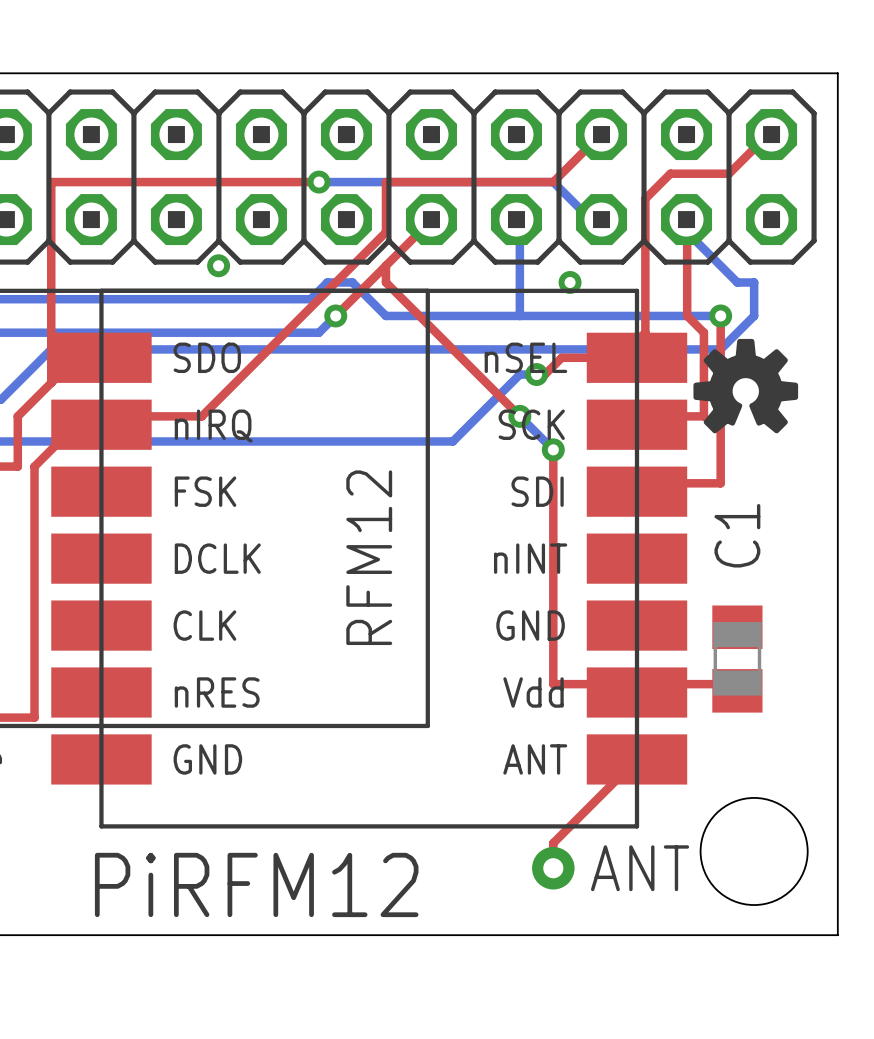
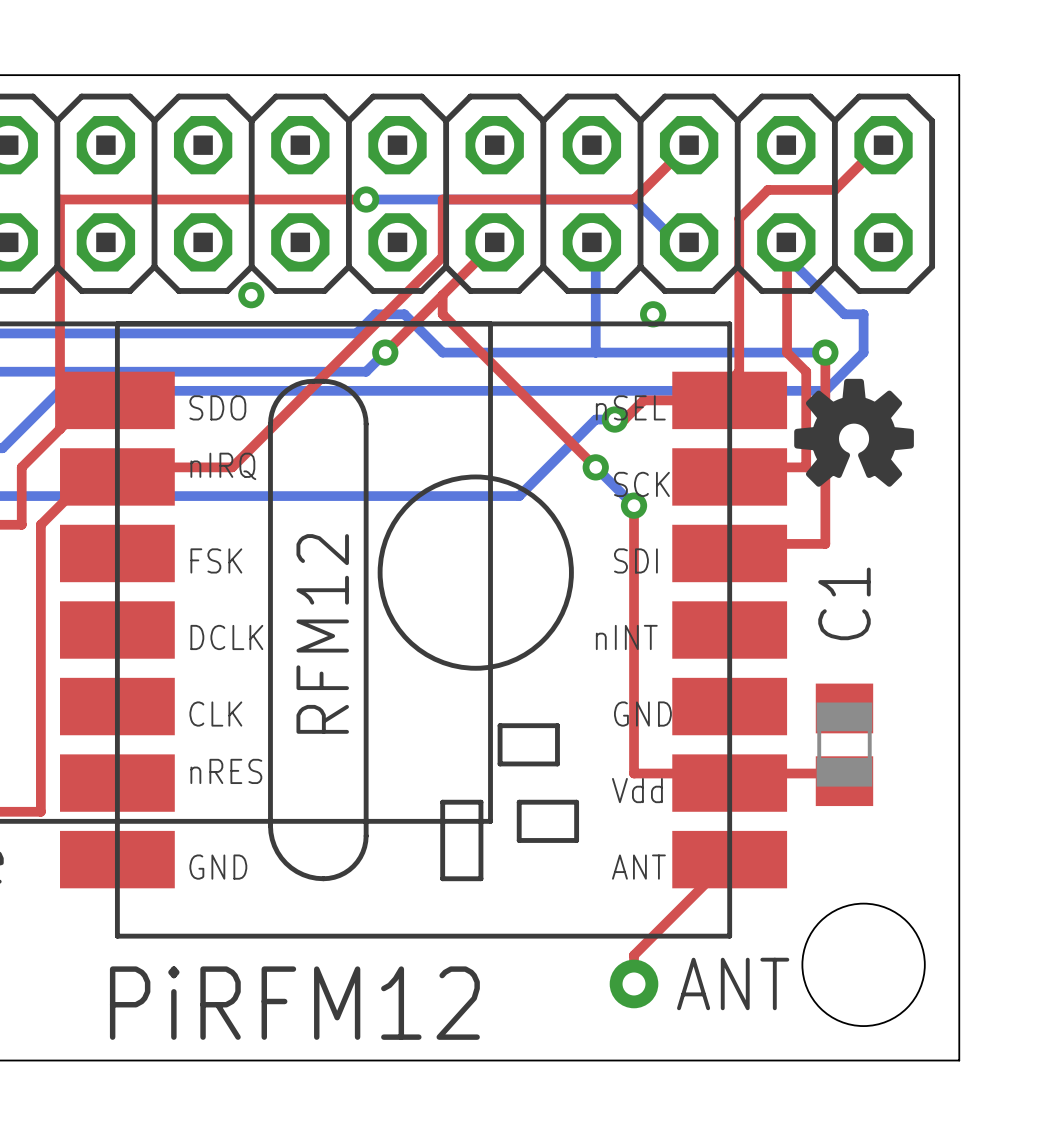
part footprint: [51, 288, 688, 829] -> [60, 321, 788, 939]

